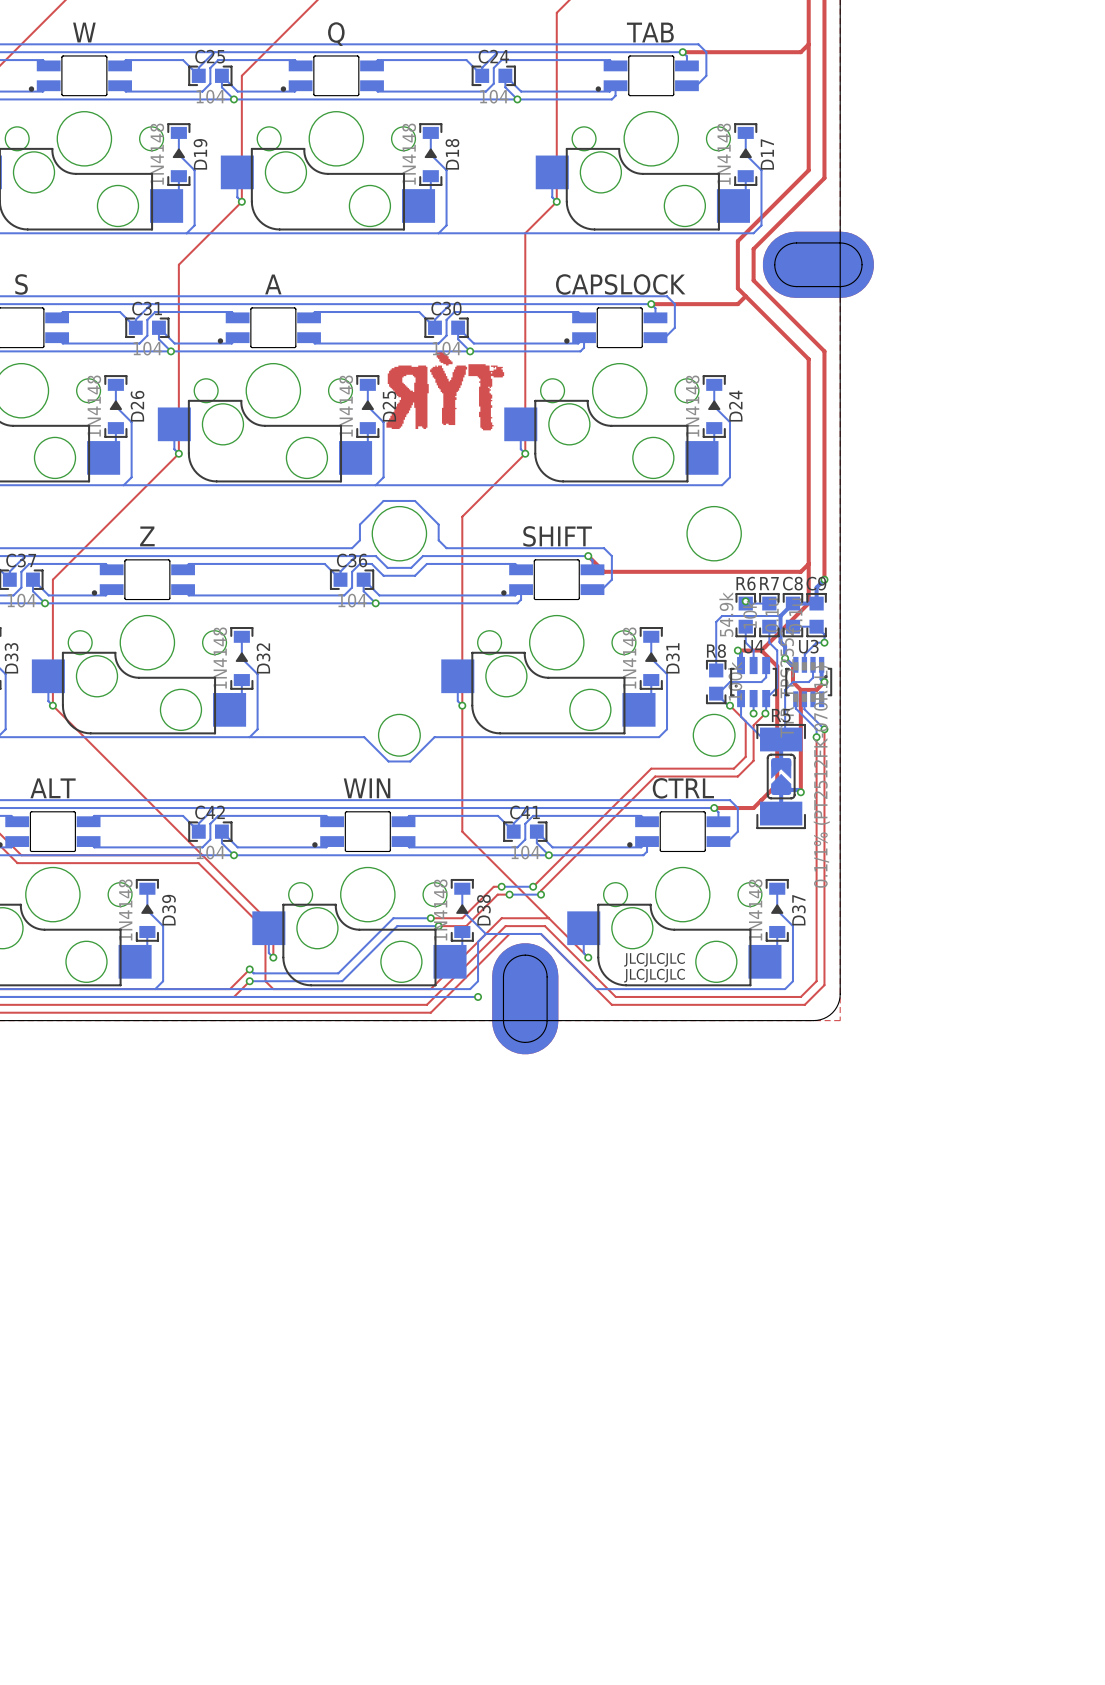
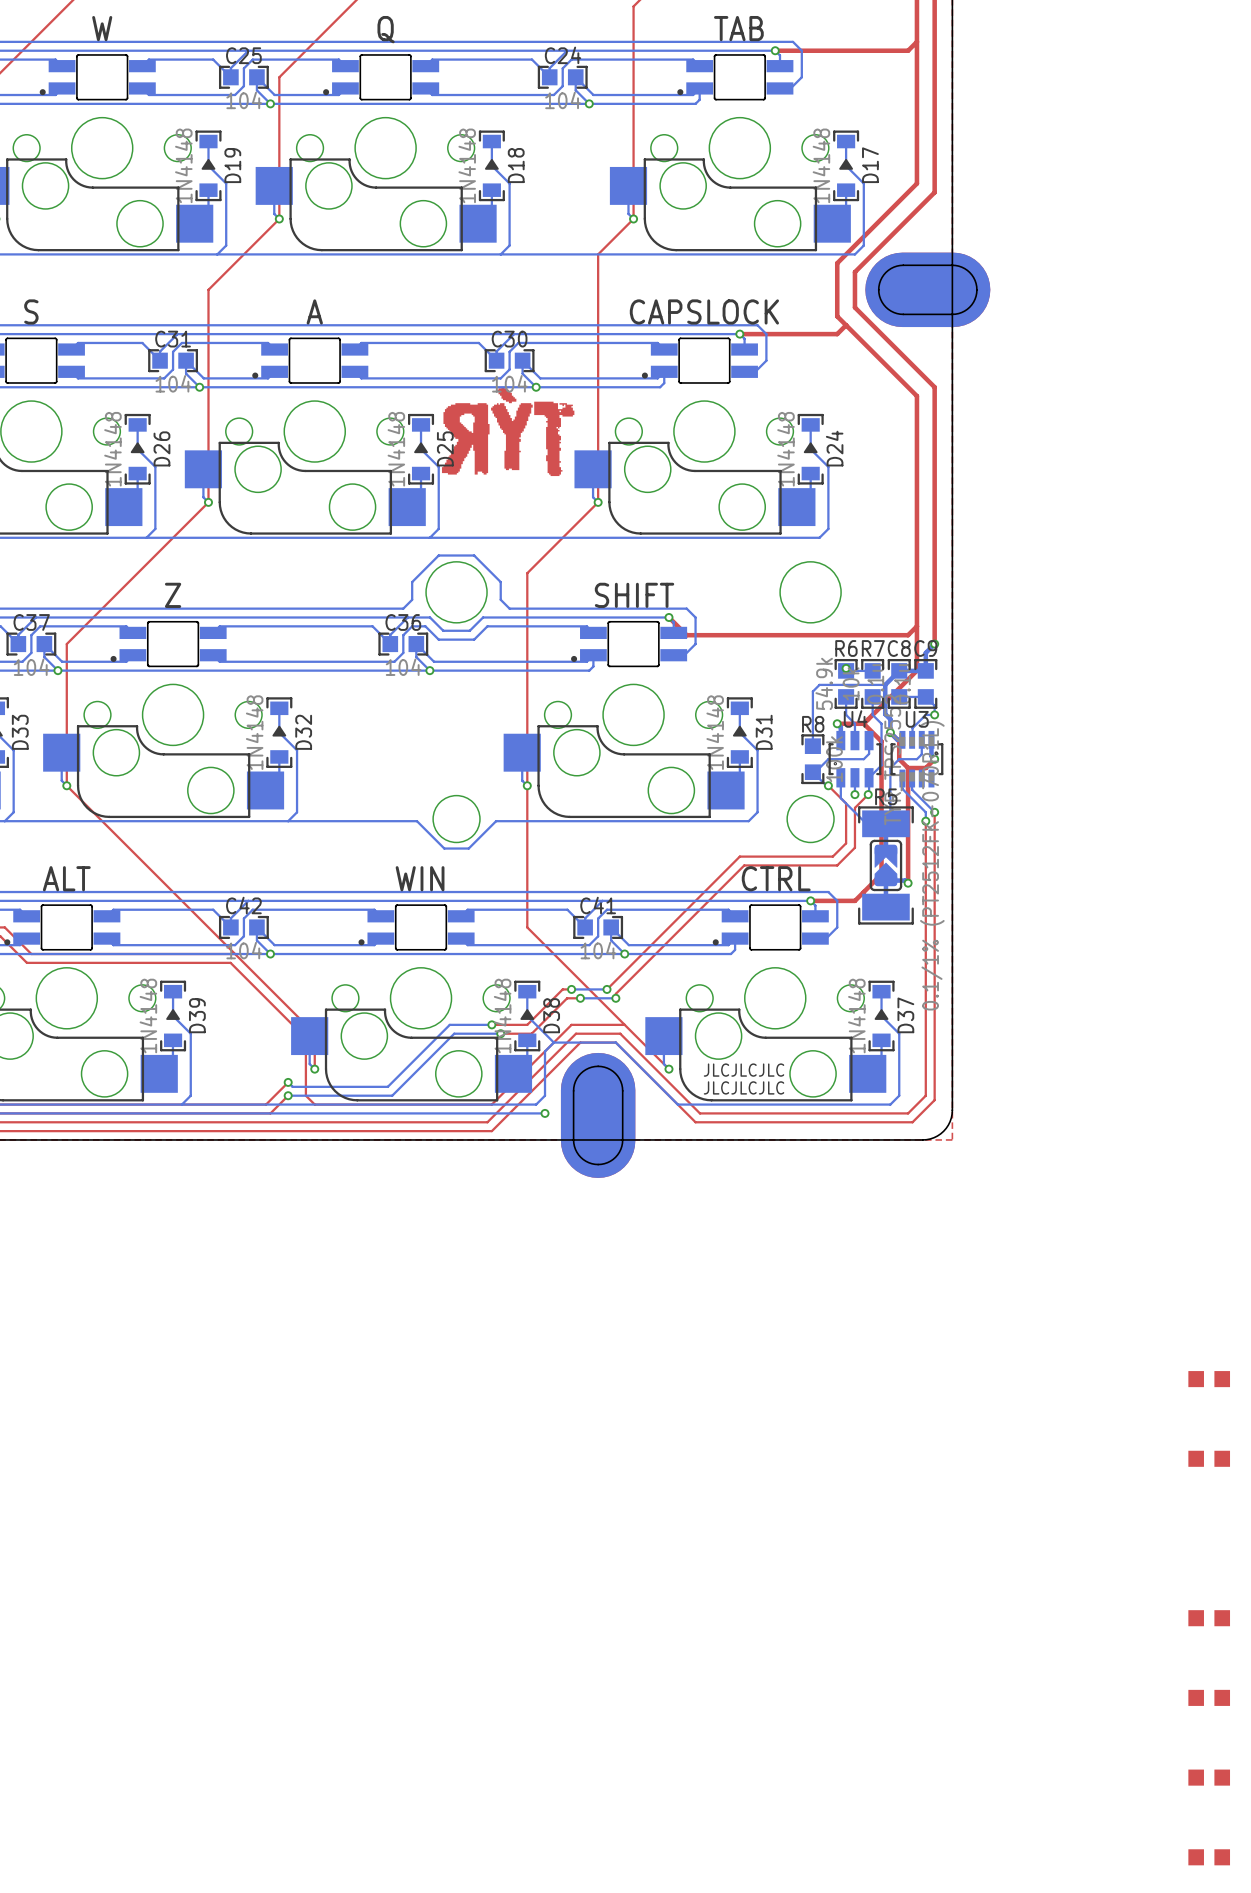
part: none -> (1209, 1379)
part: none -> (1209, 1458)
part: none -> (1209, 1618)
part: none -> (1209, 1697)
part: none -> (1209, 1777)
part: none -> (1209, 1857)

